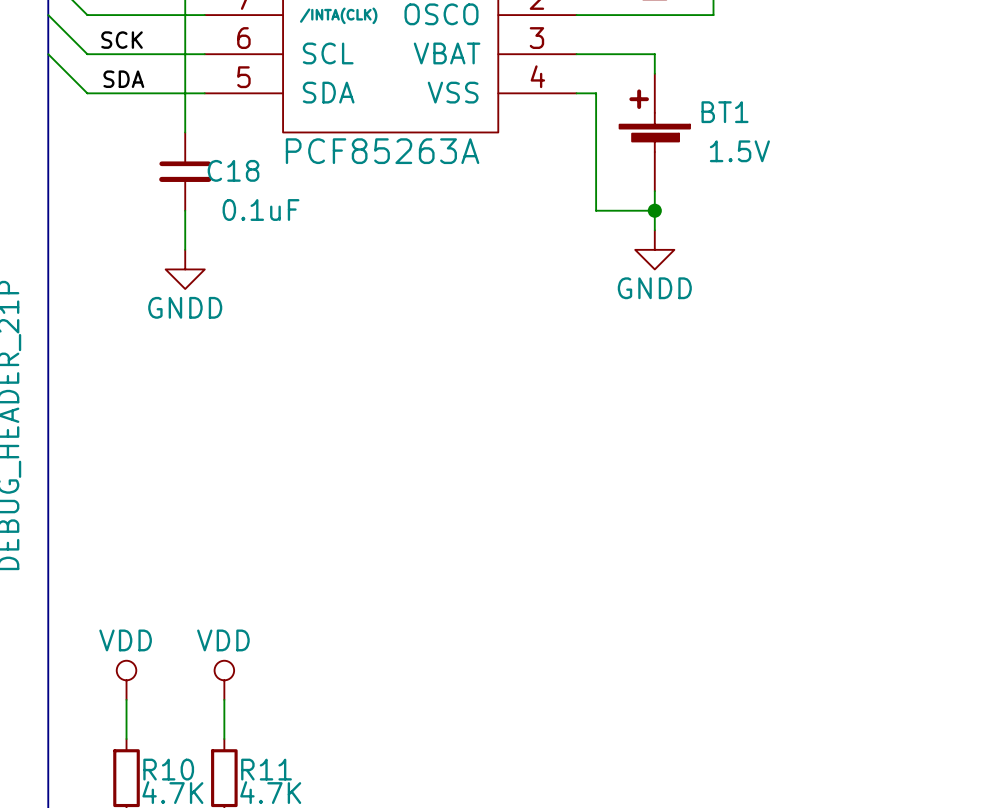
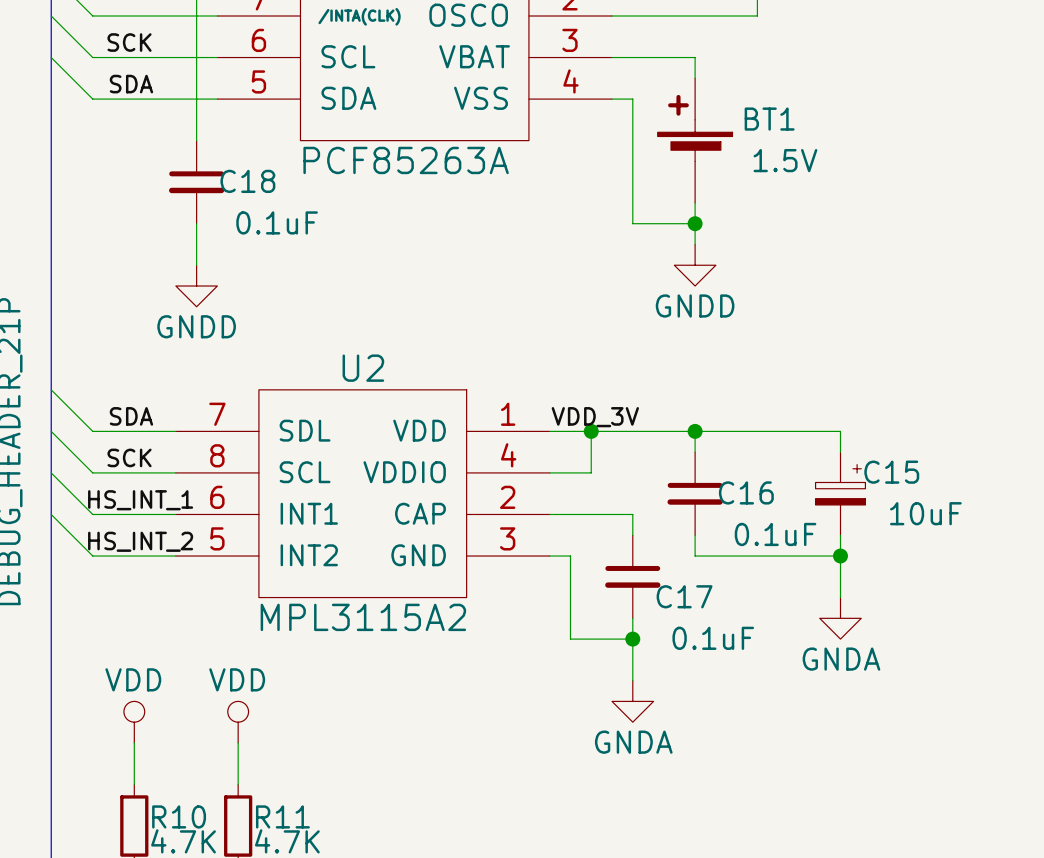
wire: none -> (51, 389) (92, 431) (175, 431)
label: none -> SDA (131, 416)
label: none -> VDD_3V (595, 417)
wire: none -> (51, 431) (92, 472) (175, 472)
wire: none -> (549, 431) (840, 431) (840, 452)
wire: none -> (591, 431) (591, 472) (549, 472)
junction: none -> (591, 431)
wire: none -> (695, 431) (695, 452)
junction: none -> (695, 431)
label: none -> SCK (129, 457)
wire: none -> (51, 472) (92, 514) (175, 514)
U2: none -> MPL3115A2 (362, 493)
C16: none -> 0.1uF (695, 493)
C15: none -> 10uF (840, 493)
label: none -> HS_INT_1 (140, 500)
wire: none -> (51, 514) (92, 556) (175, 556)
wire: none -> (549, 514) (632, 514) (632, 535)
wire: none -> (695, 535) (695, 556) (840, 556)
wire: none -> (840, 535) (840, 597)
label: none -> HS_INT_2 (140, 541)
wire: none -> (549, 556) (570, 556) (570, 639) (632, 639)
junction: none -> (840, 556)
C17: none -> 0.1uF (632, 576)
wire: none -> (632, 618) (632, 680)
power symbol: none -> GNDA (840, 618)
junction: none -> (632, 639)
power symbol: none -> GNDA (632, 701)

